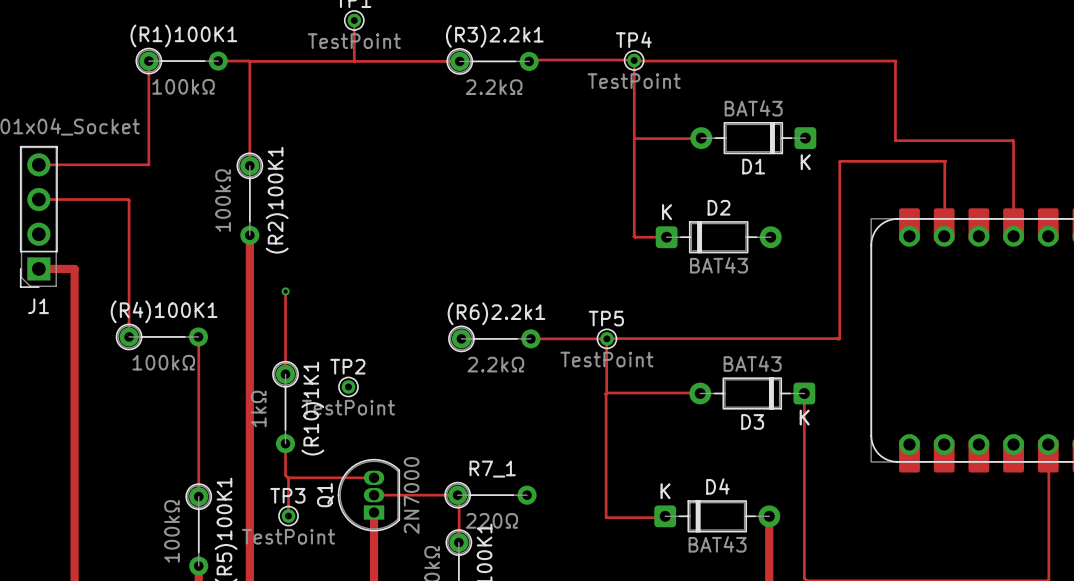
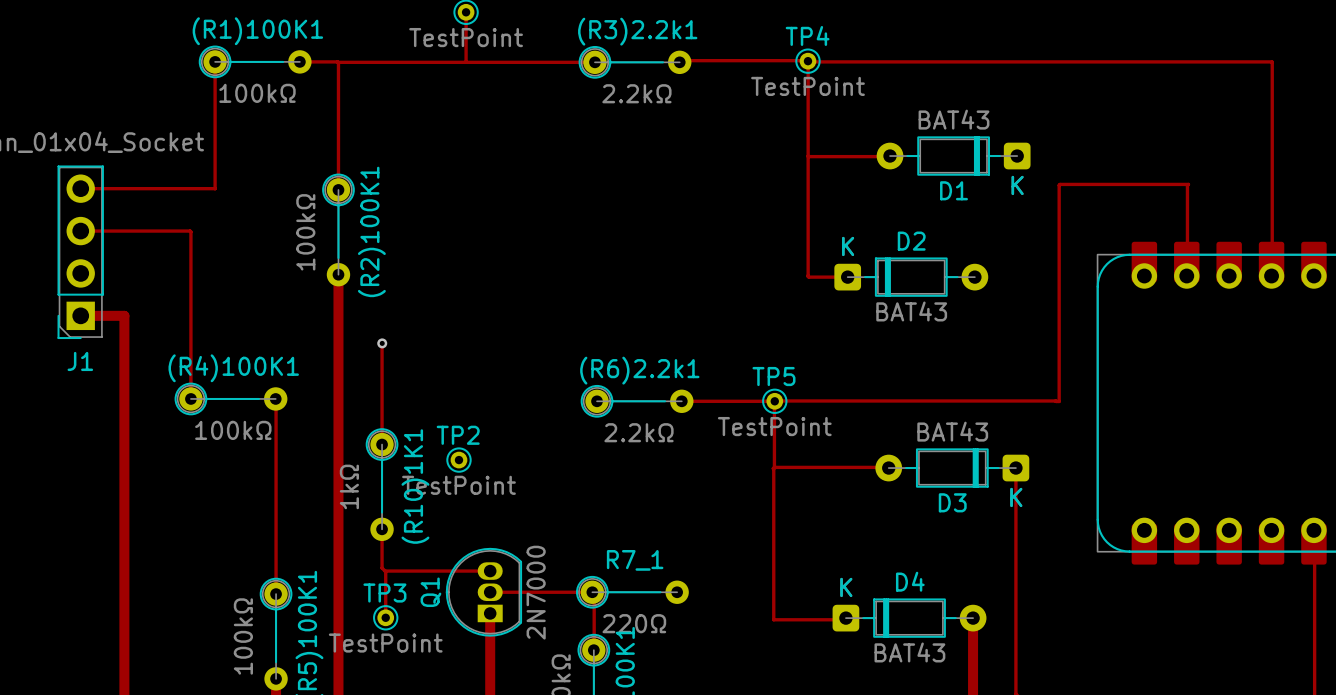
track: (895, 61) (895, 140) (1013, 141) -> (1127, 61) (1272, 62) (1272, 259)
track: (1013, 141) (1013, 236) -> none

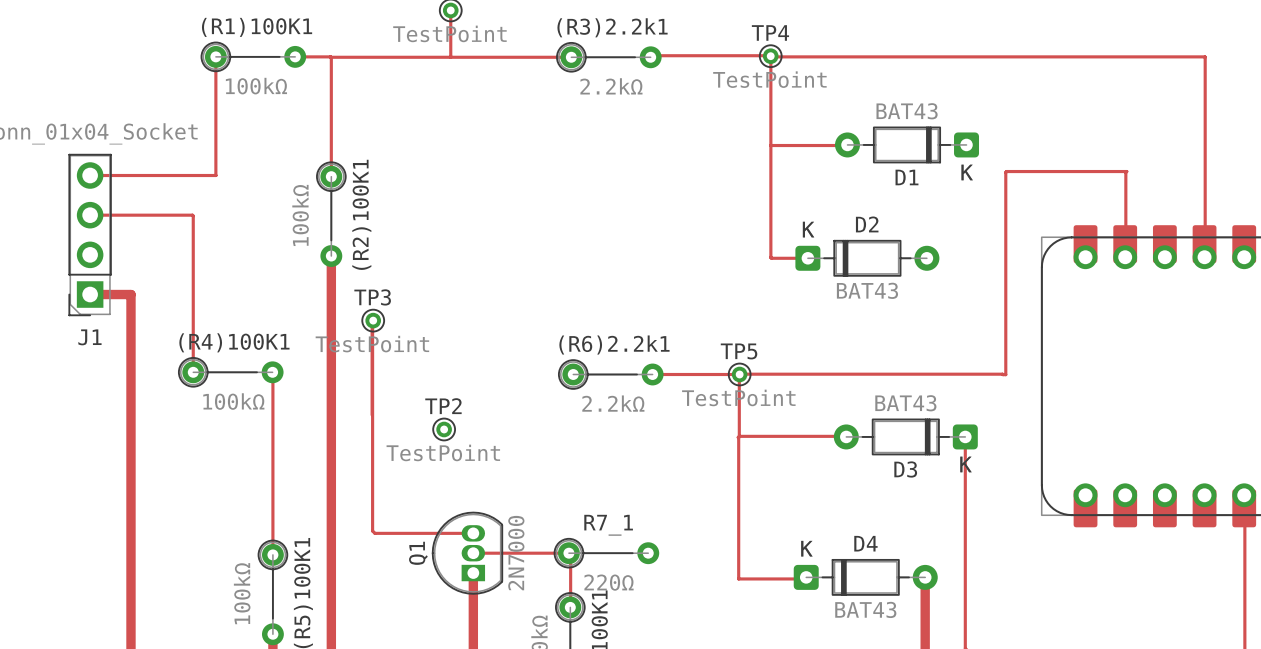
track: none -> (372, 320) (372, 531) (374, 533)
via: (382, 343) -> none
(R10)1K1: 1kΩ (382, 484) -> none
track: (382, 529) (382, 568) (385, 571) (385, 617) -> none
TP3 position: (385, 617) -> (373, 320)

